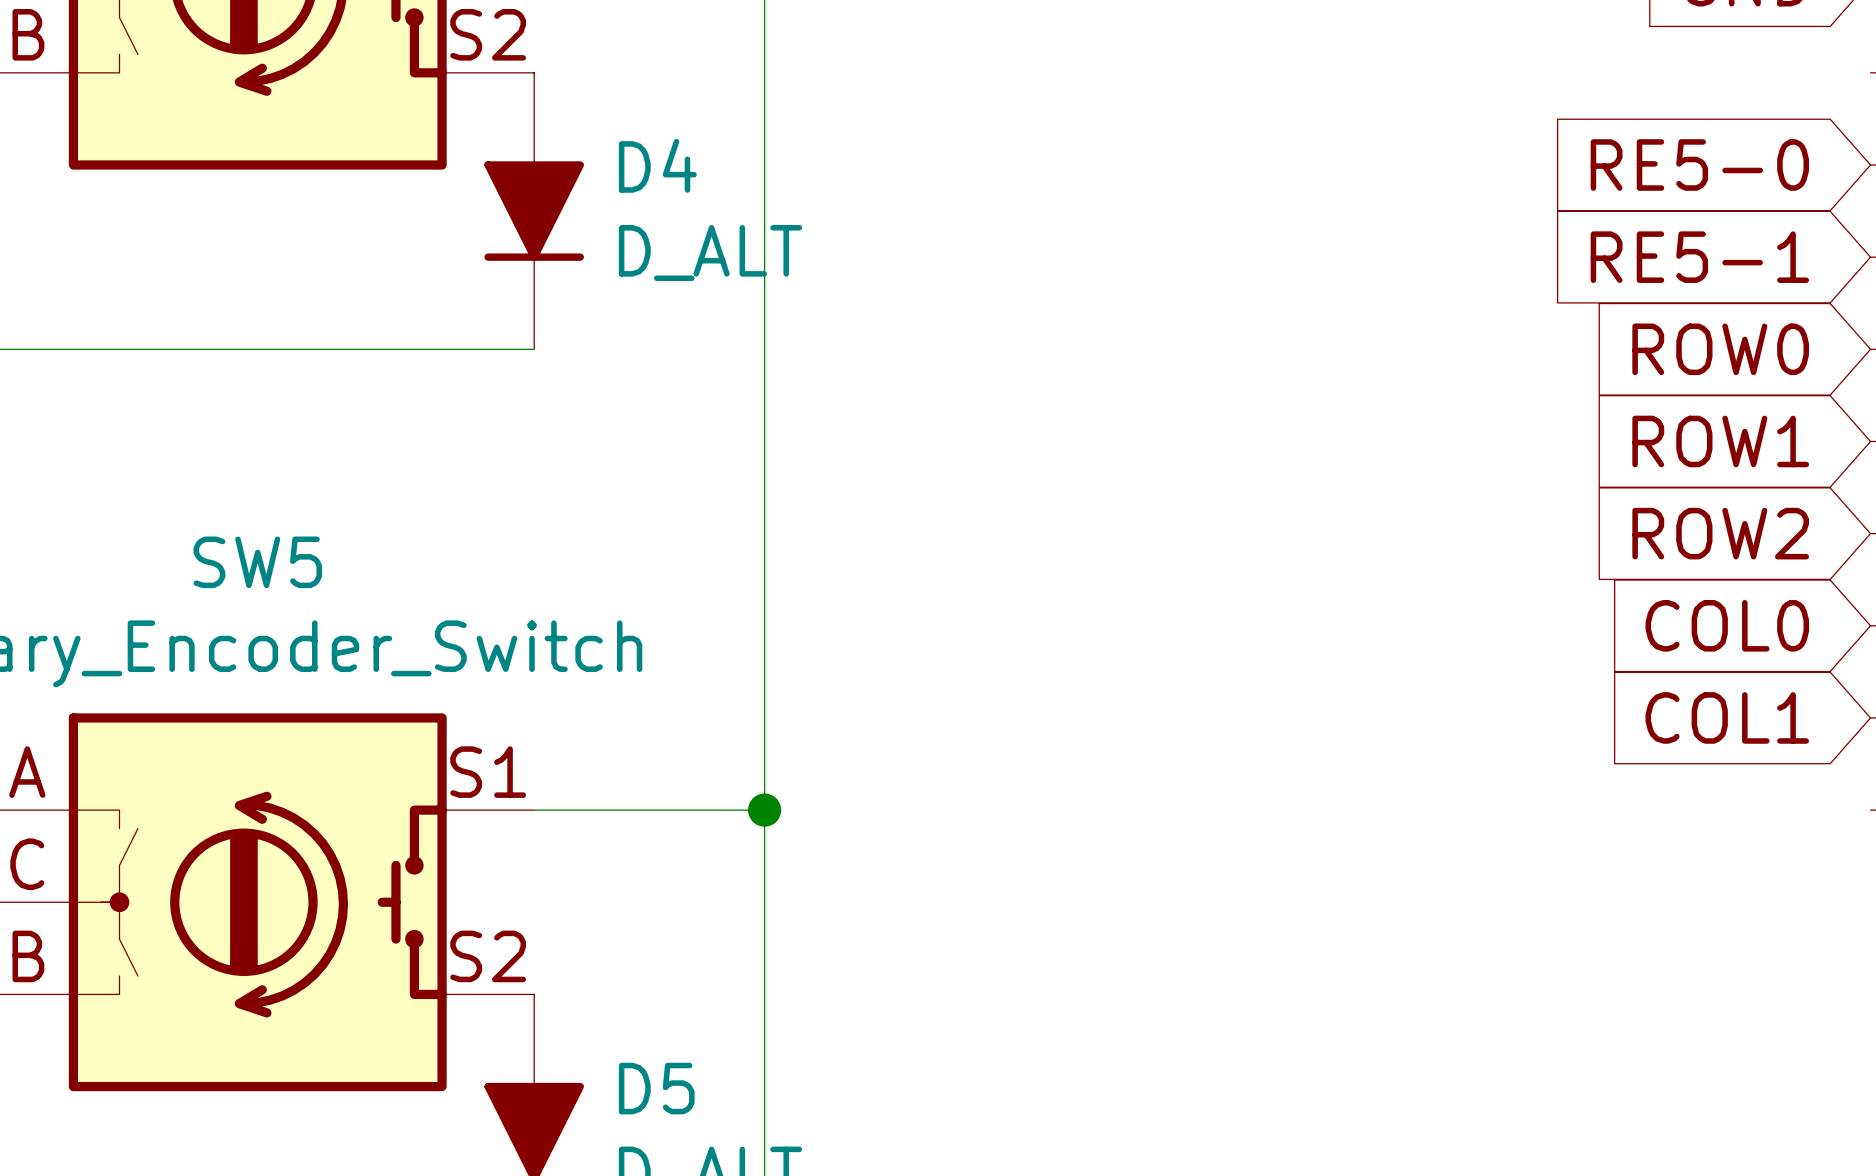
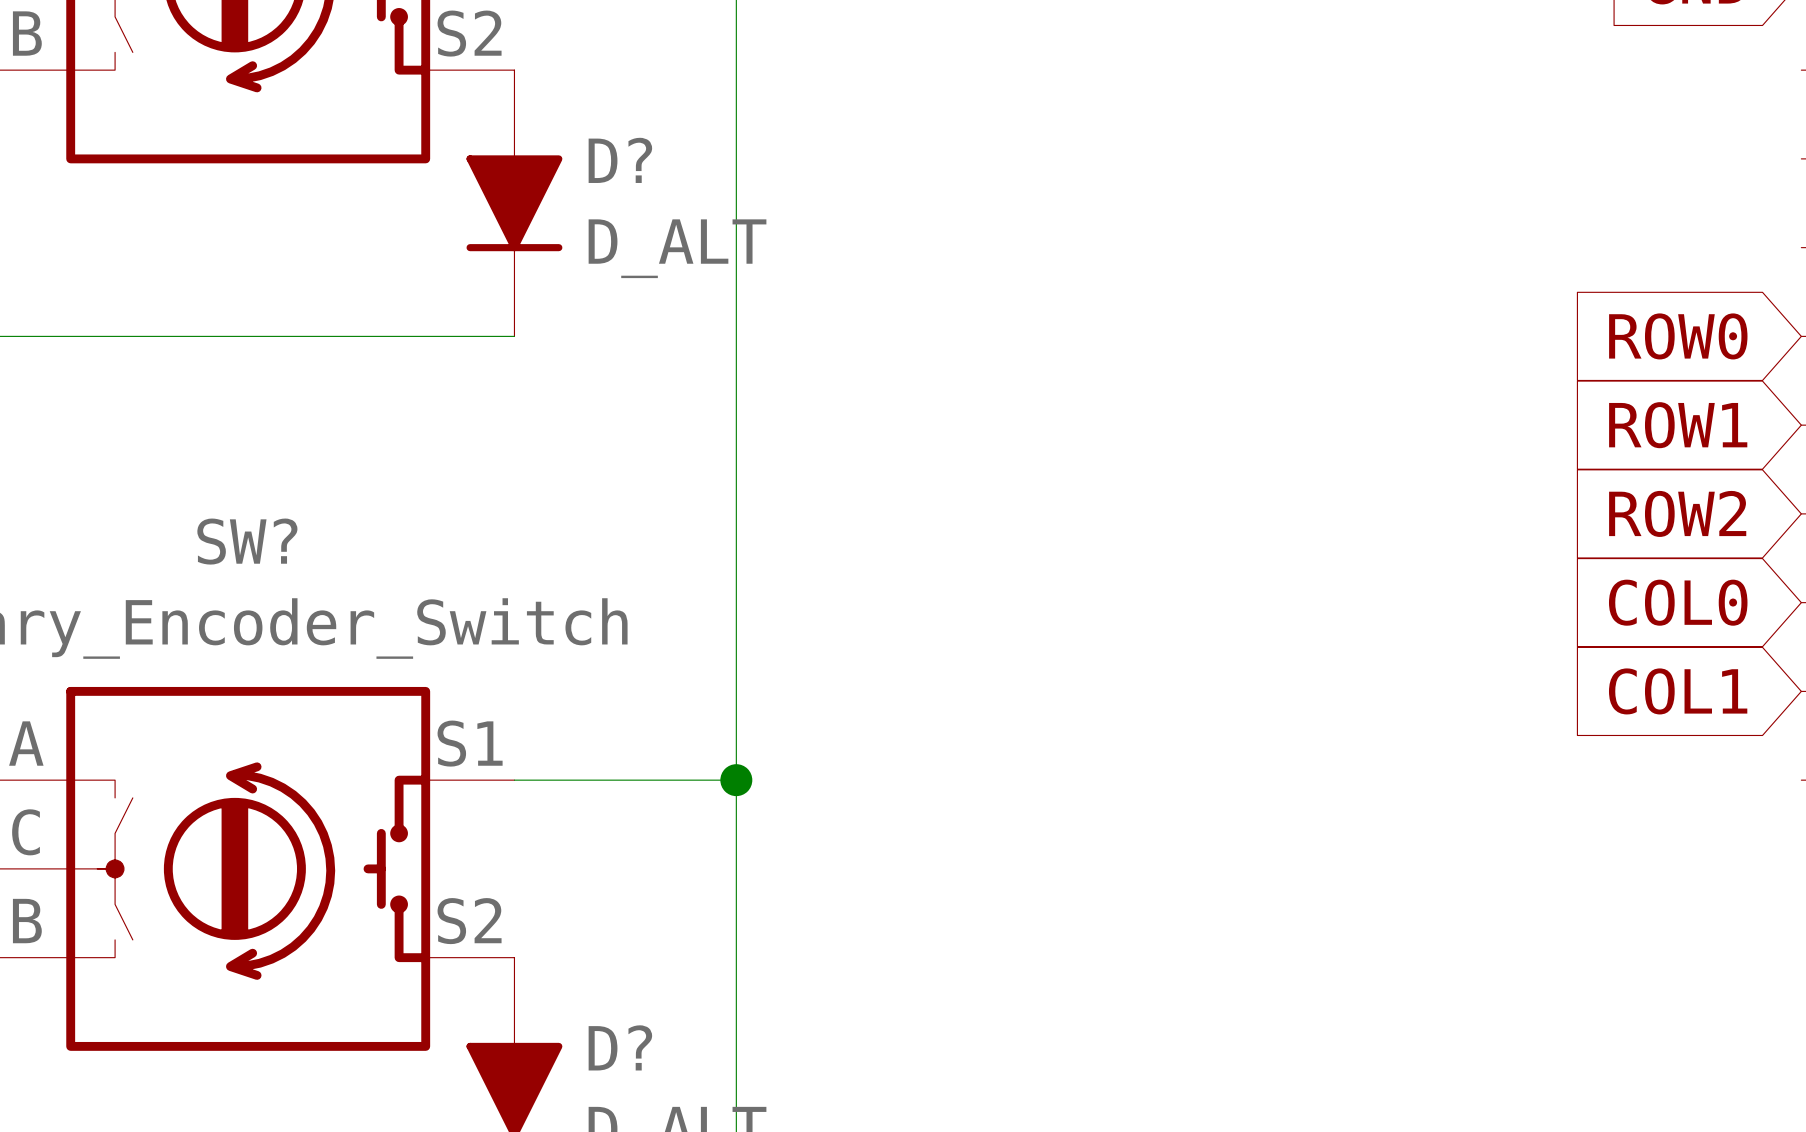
global label: RE5-0 (1699, 164) -> none
D4 name: D4 (657, 165) -> D? (620, 160)
global label: RE5-1 (1699, 257) -> none
SW5 name: SW5 (257, 562) -> SW? (247, 541)
D5 name: D5 (656, 1088) -> D? (620, 1047)

